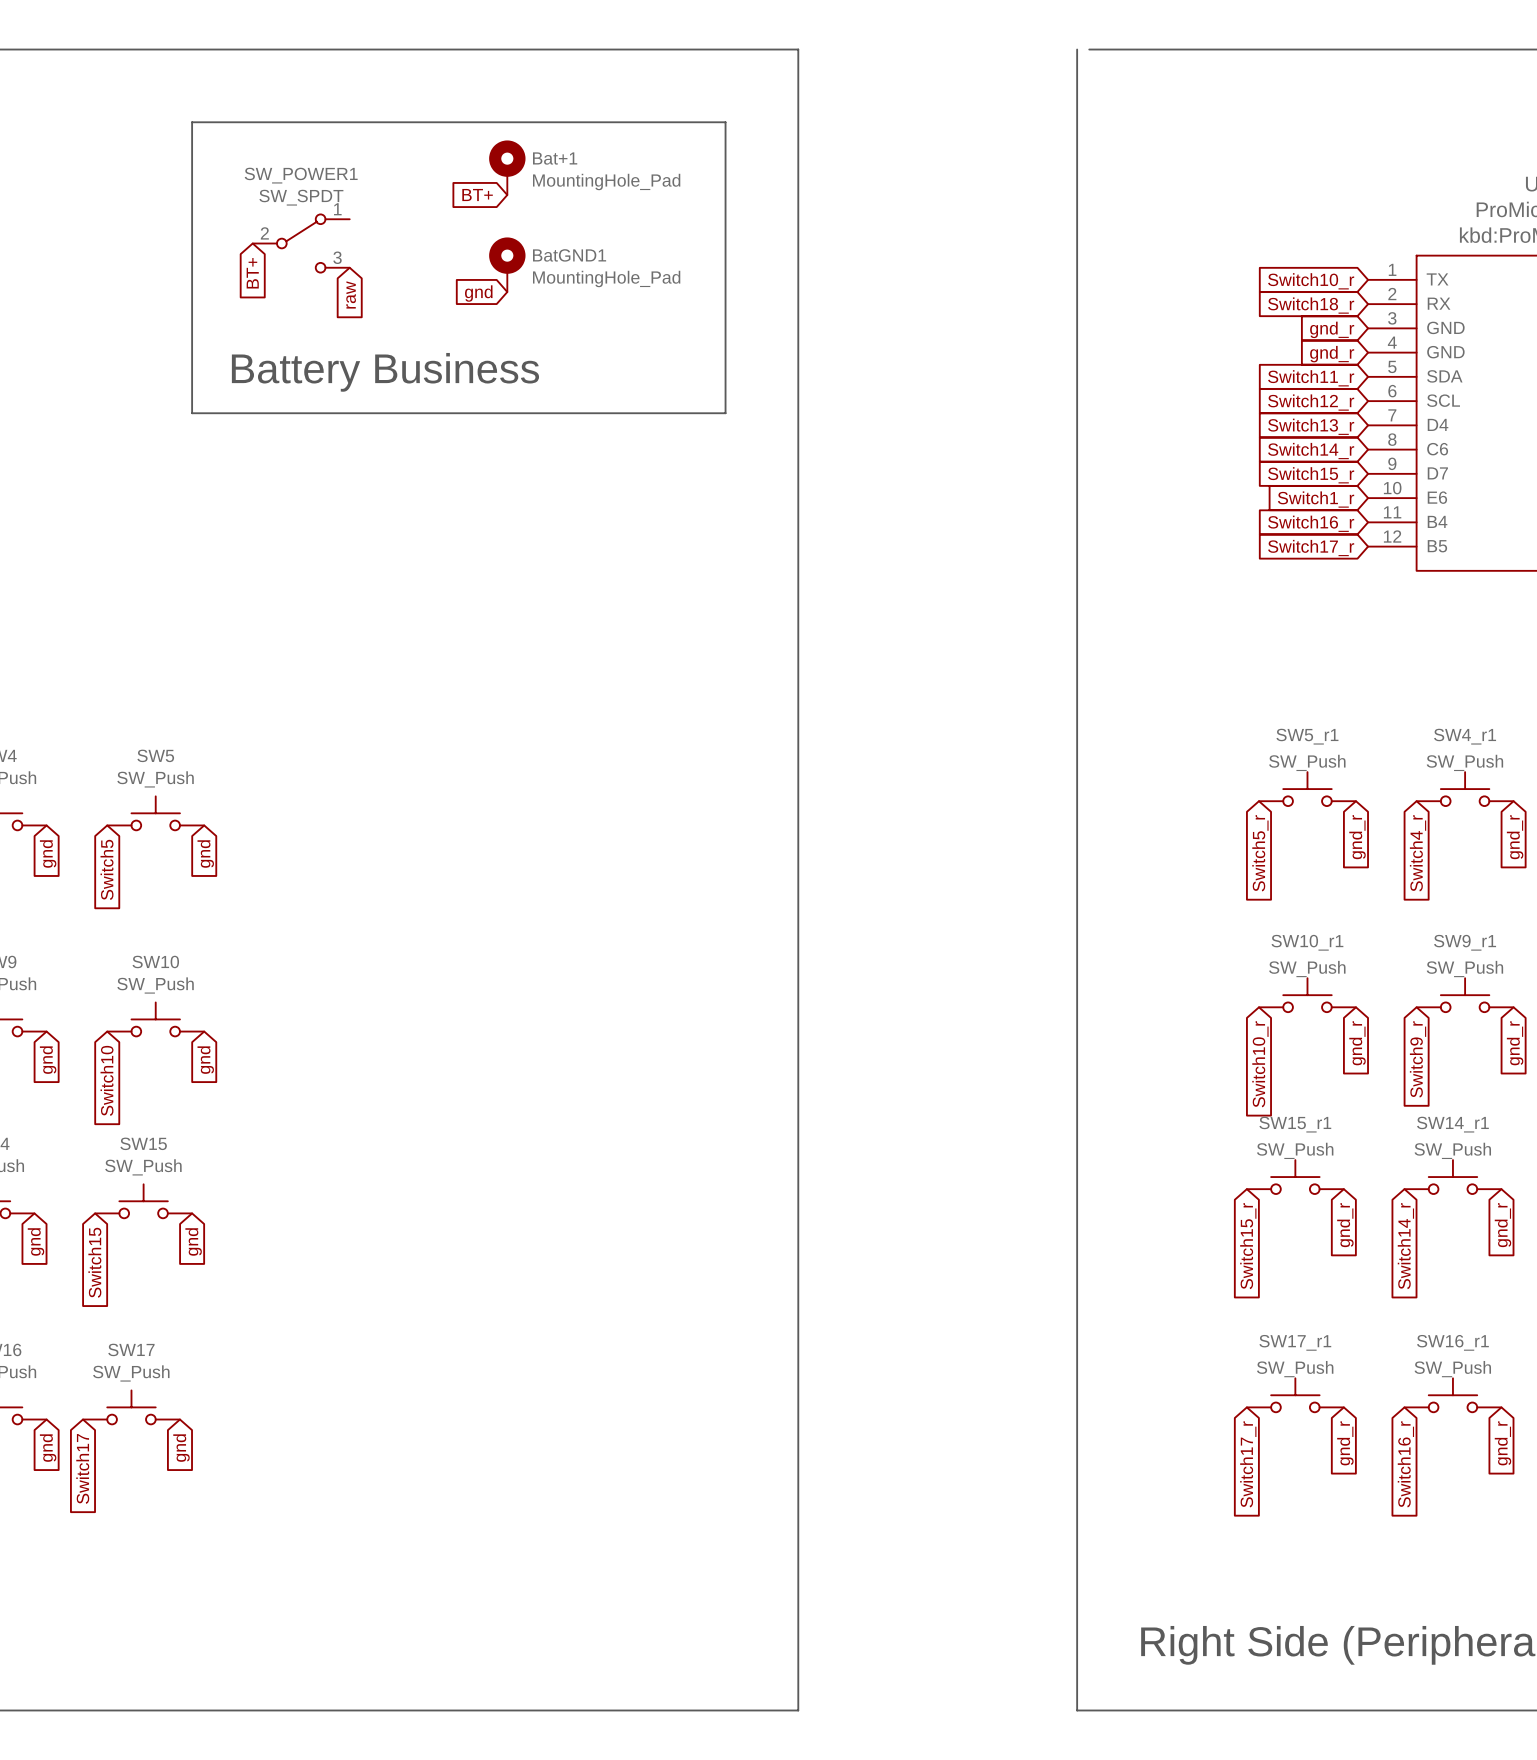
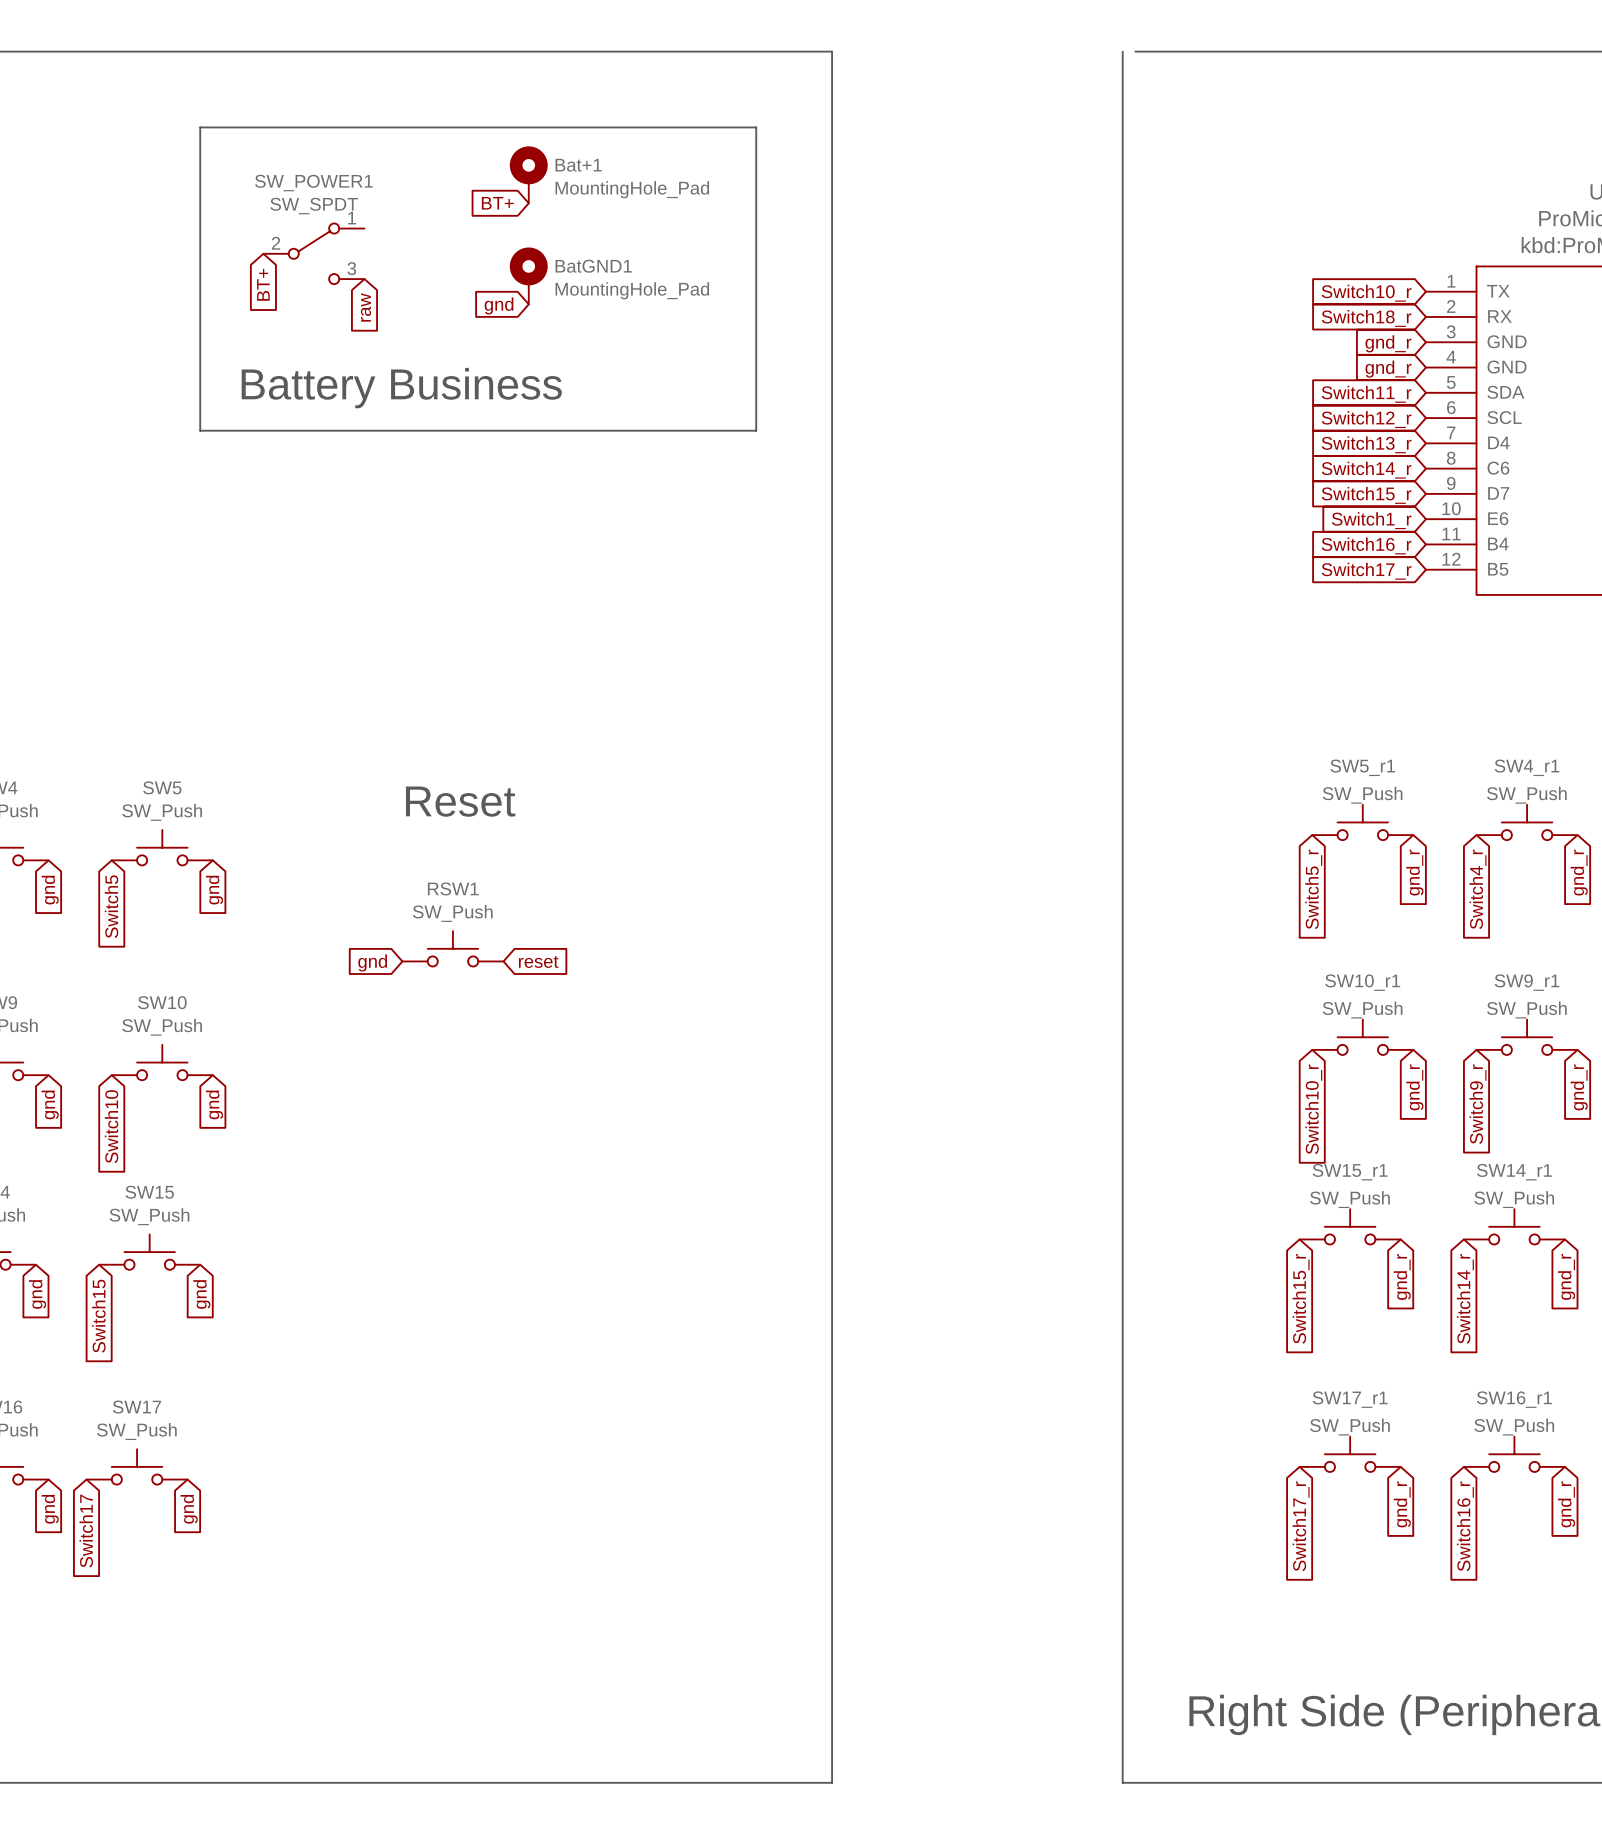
text: none -> Reset (460, 801)
RSW1: none -> SW_Push (452, 948)
global label: none -> reset (538, 961)
global label: none -> gnd (372, 963)

